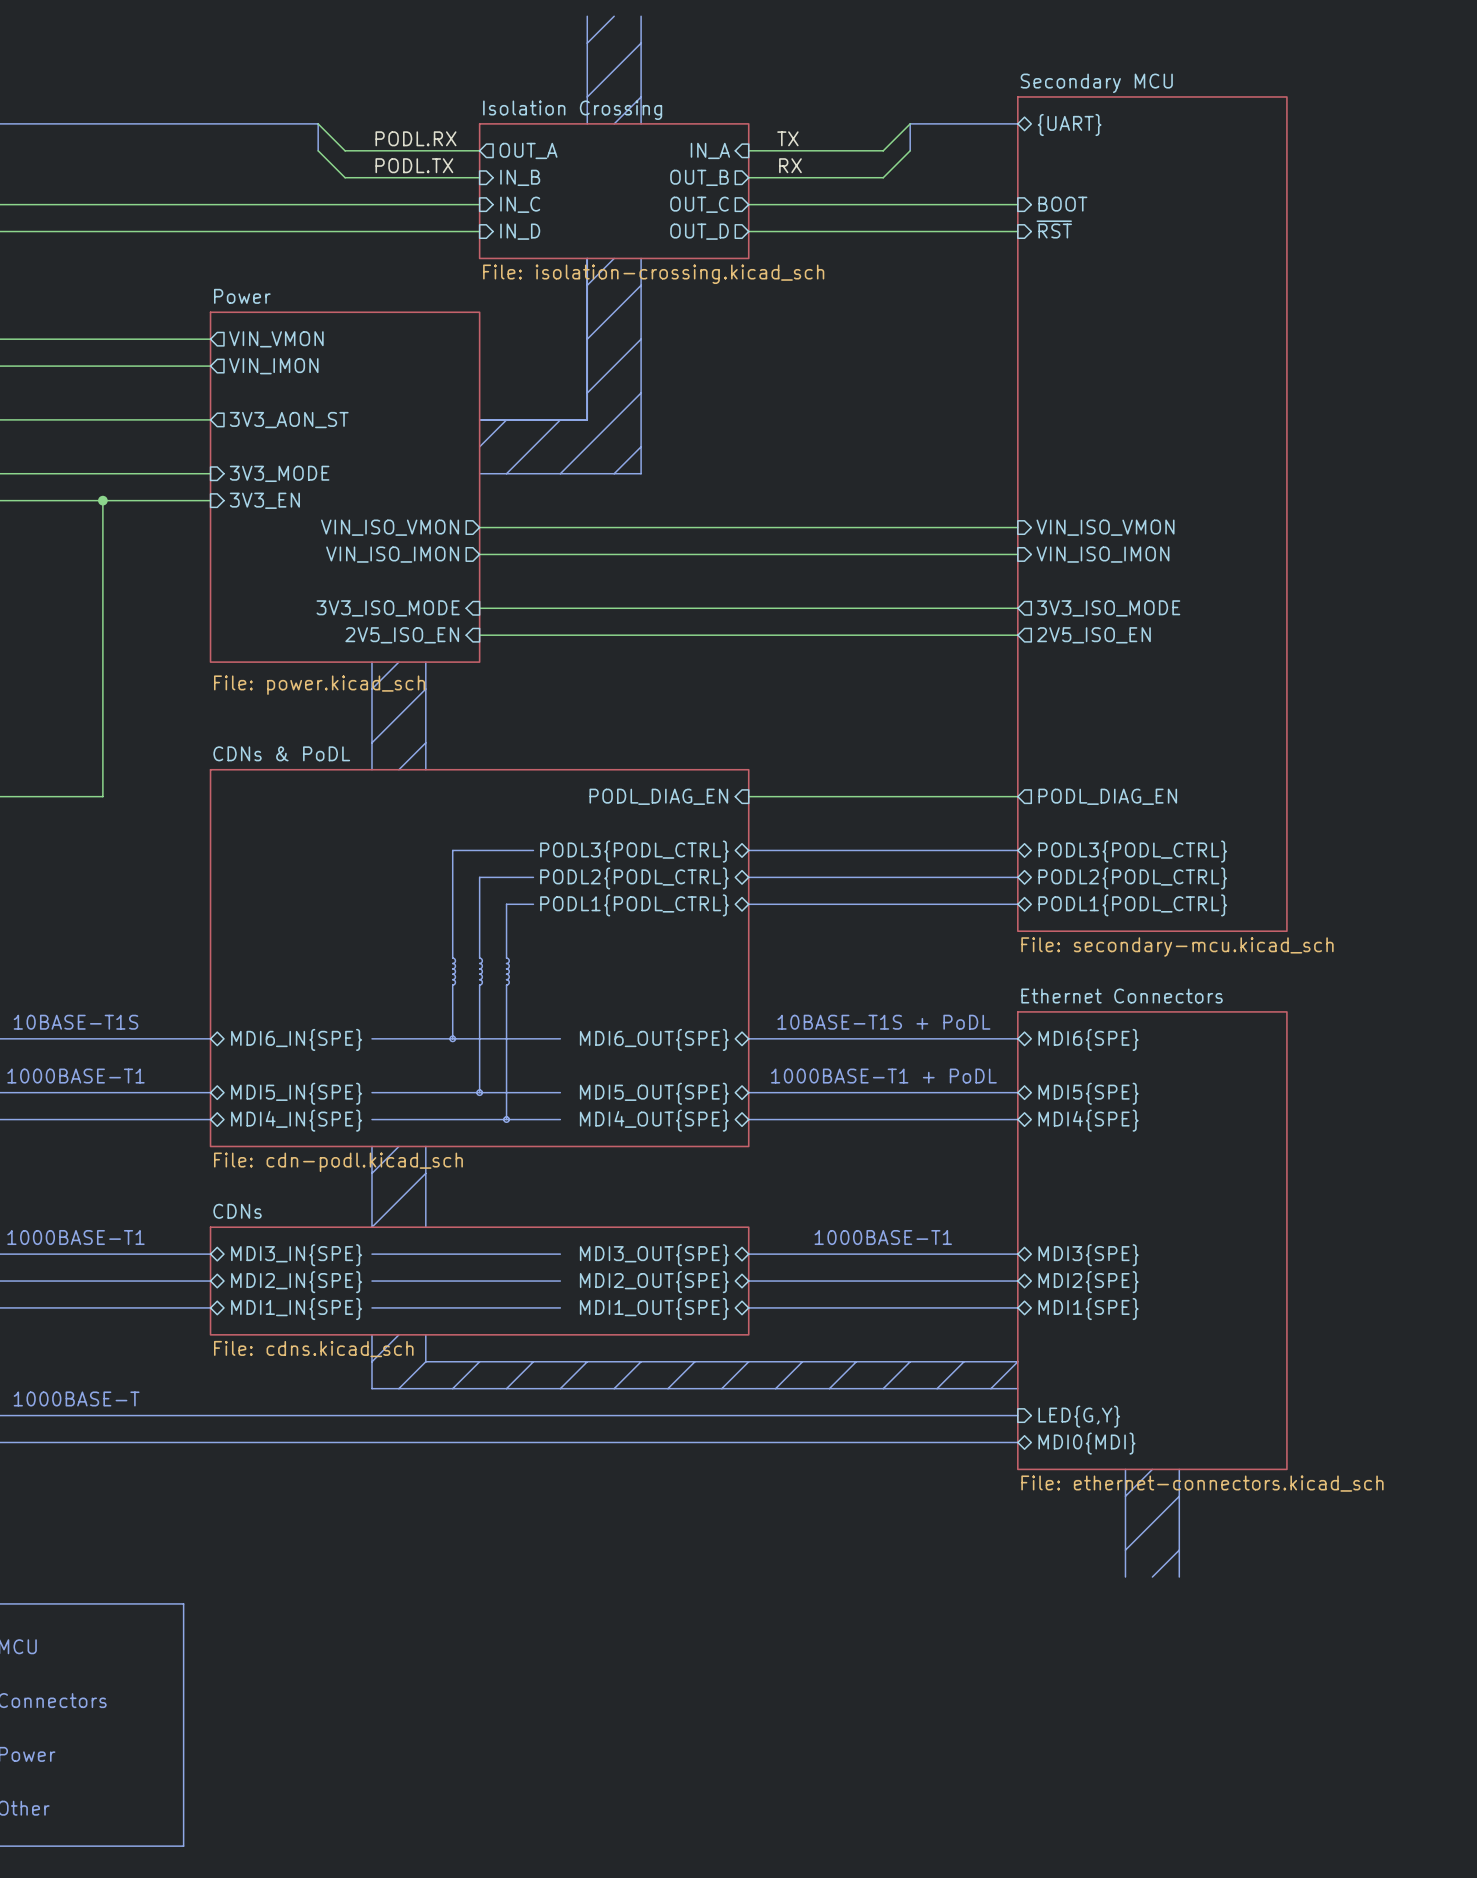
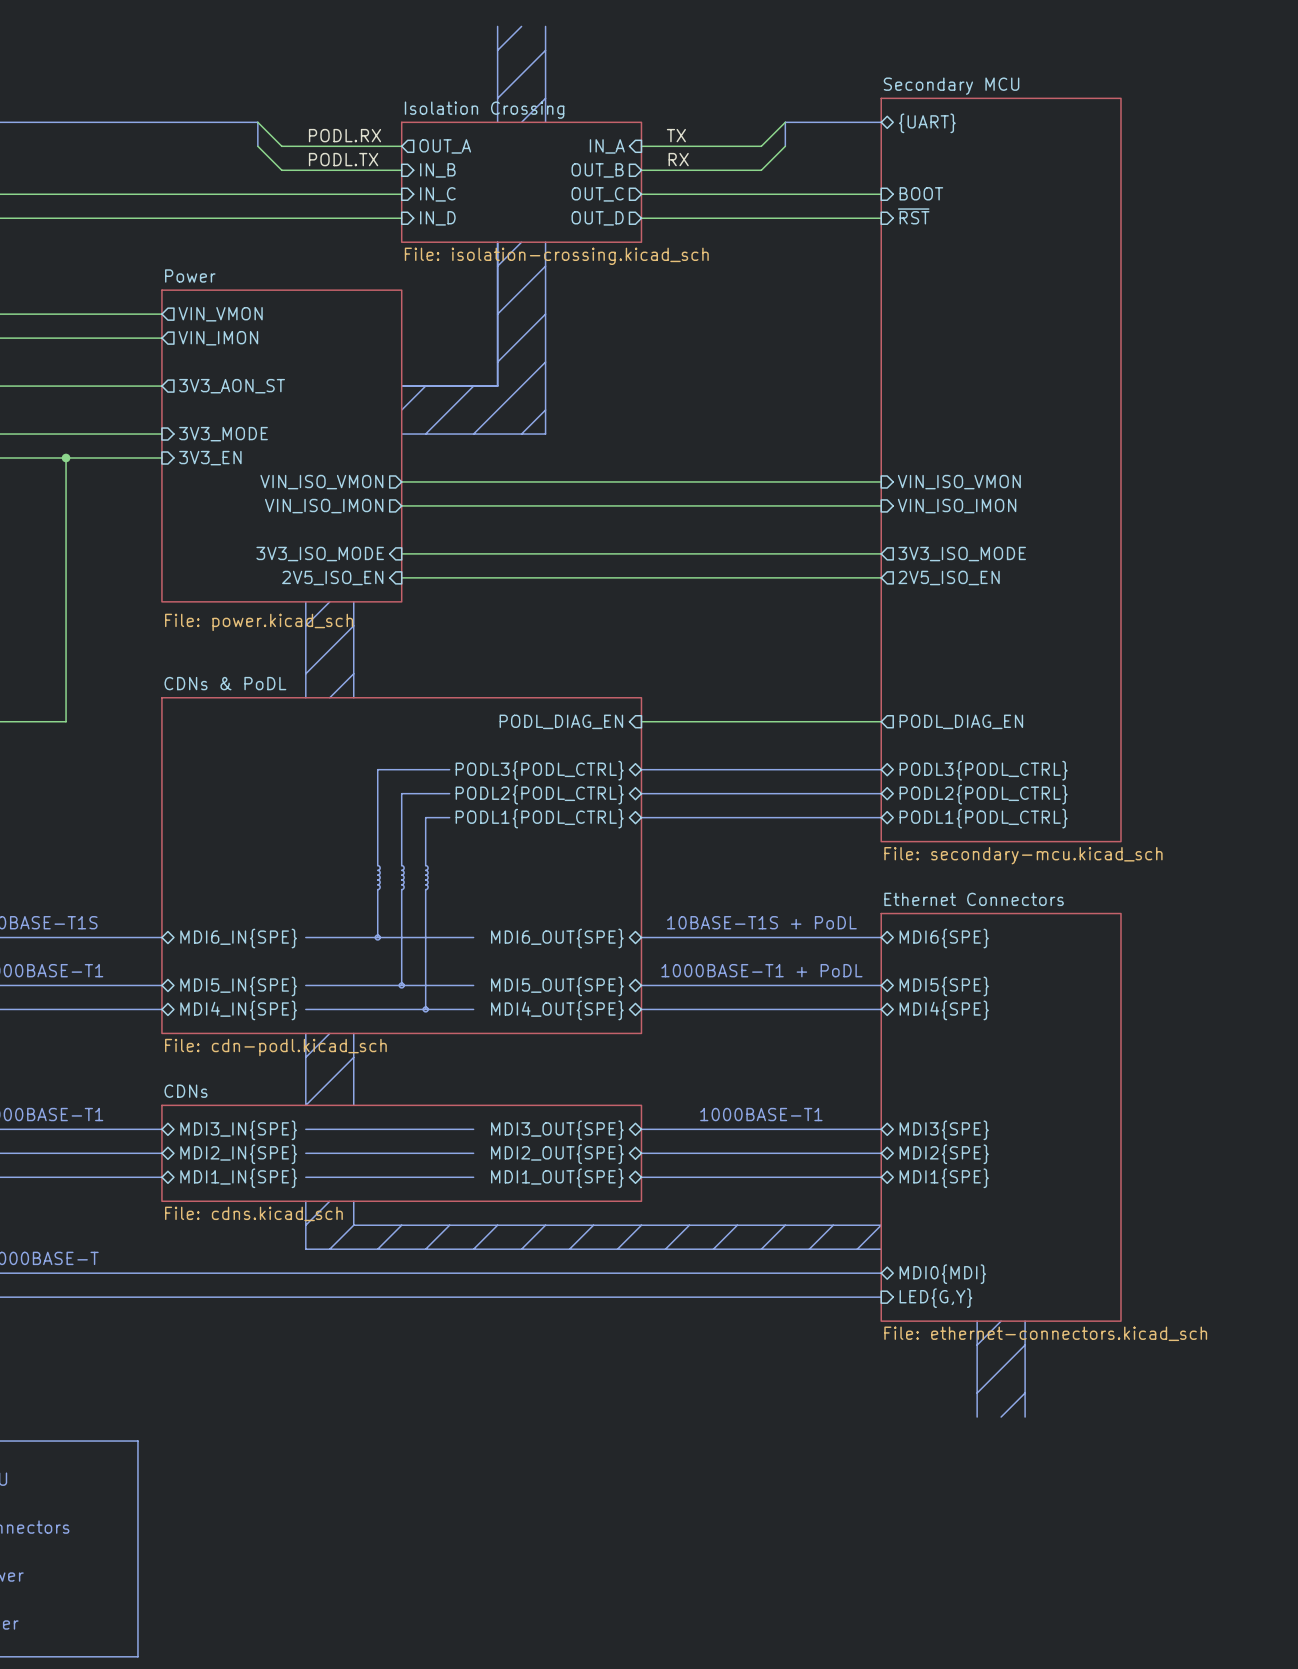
sheet pin shape: input (1079, 1416) -> bidirectional (942, 1274)
sheet pin: LED{G,Y} (1079, 1416) -> MDI0{MDI} (942, 1274)
sheet pin shape: bidirectional (1086, 1443) -> input (935, 1298)
sheet pin: MDI0{MDI} (1086, 1443) -> LED{G,Y} (935, 1298)

